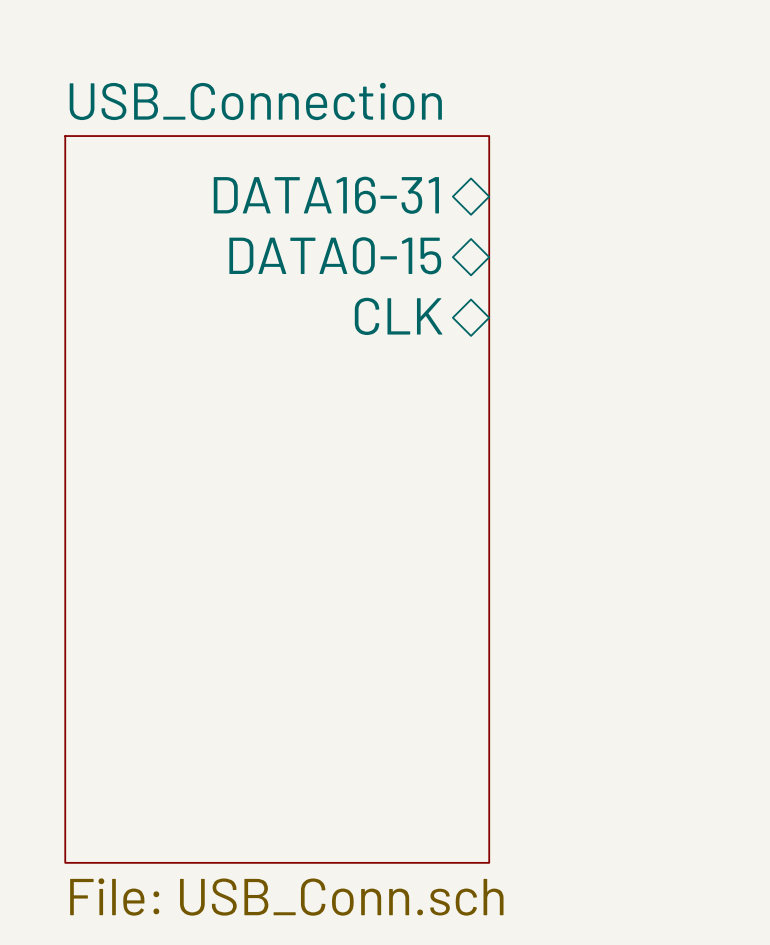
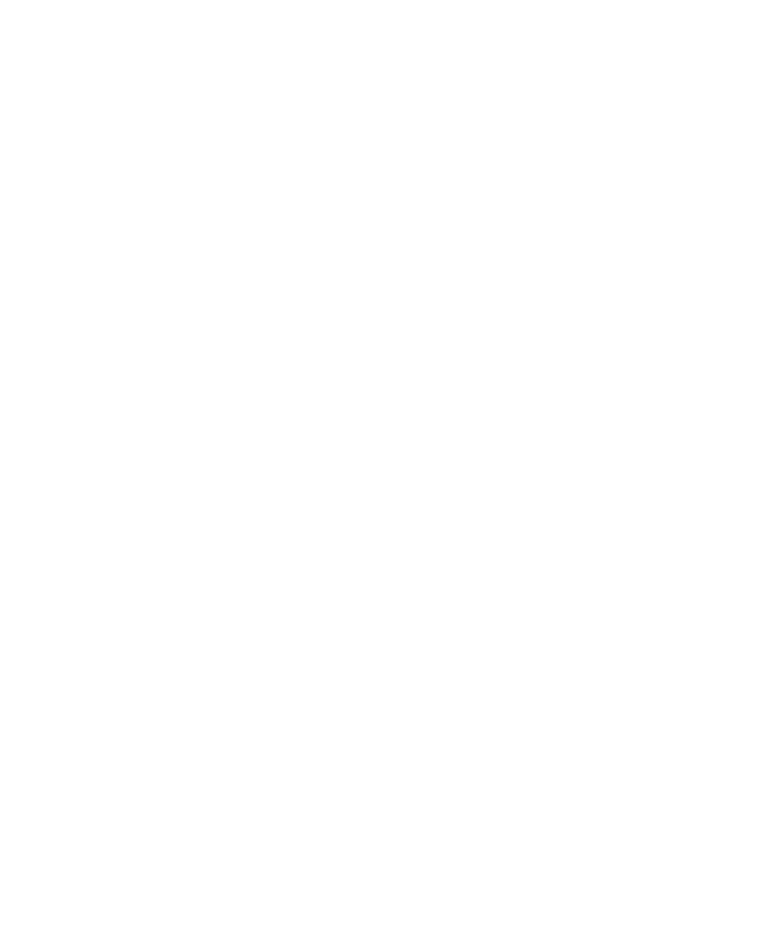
sheet pin: DATA16-31 (326, 195) -> none
sheet pin: DATA0-15 (335, 255) -> none
sheet pin: CLK (398, 316) -> none
sheet USB_Connection: File: USB_Conn.sch (277, 499) -> none

